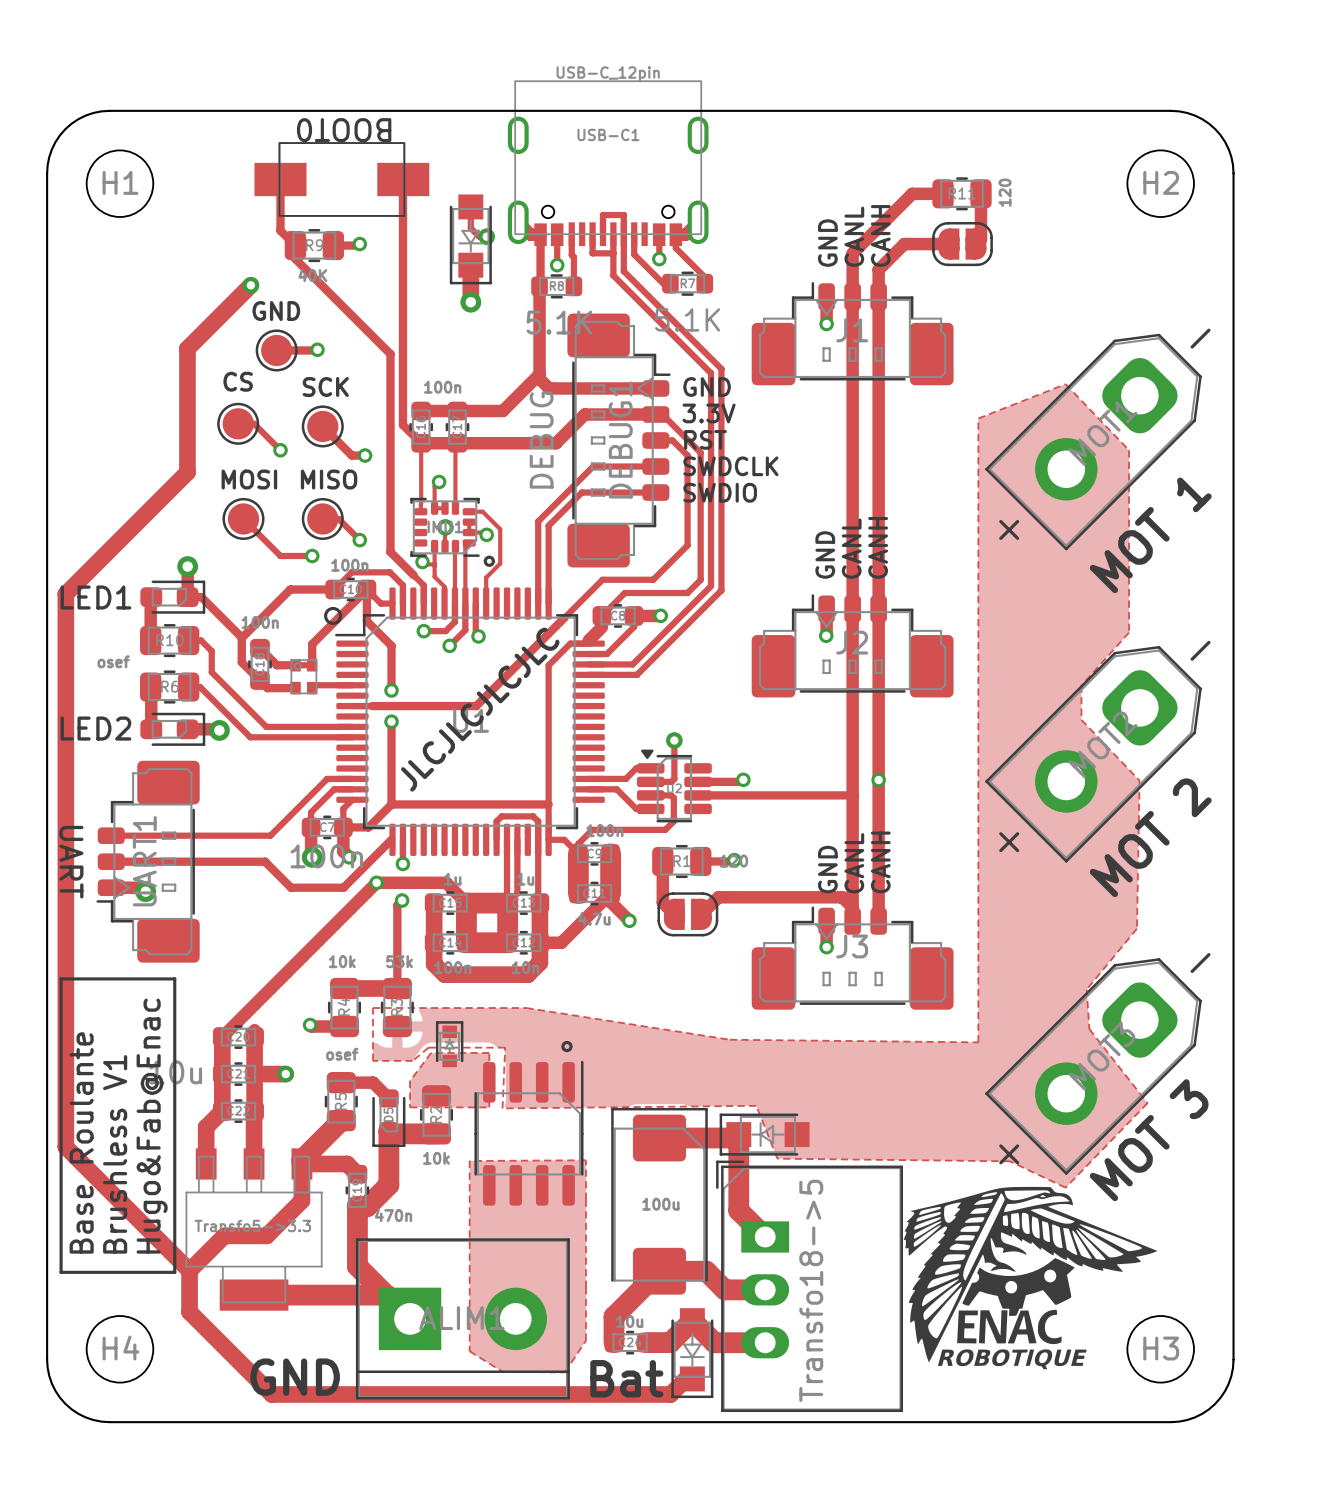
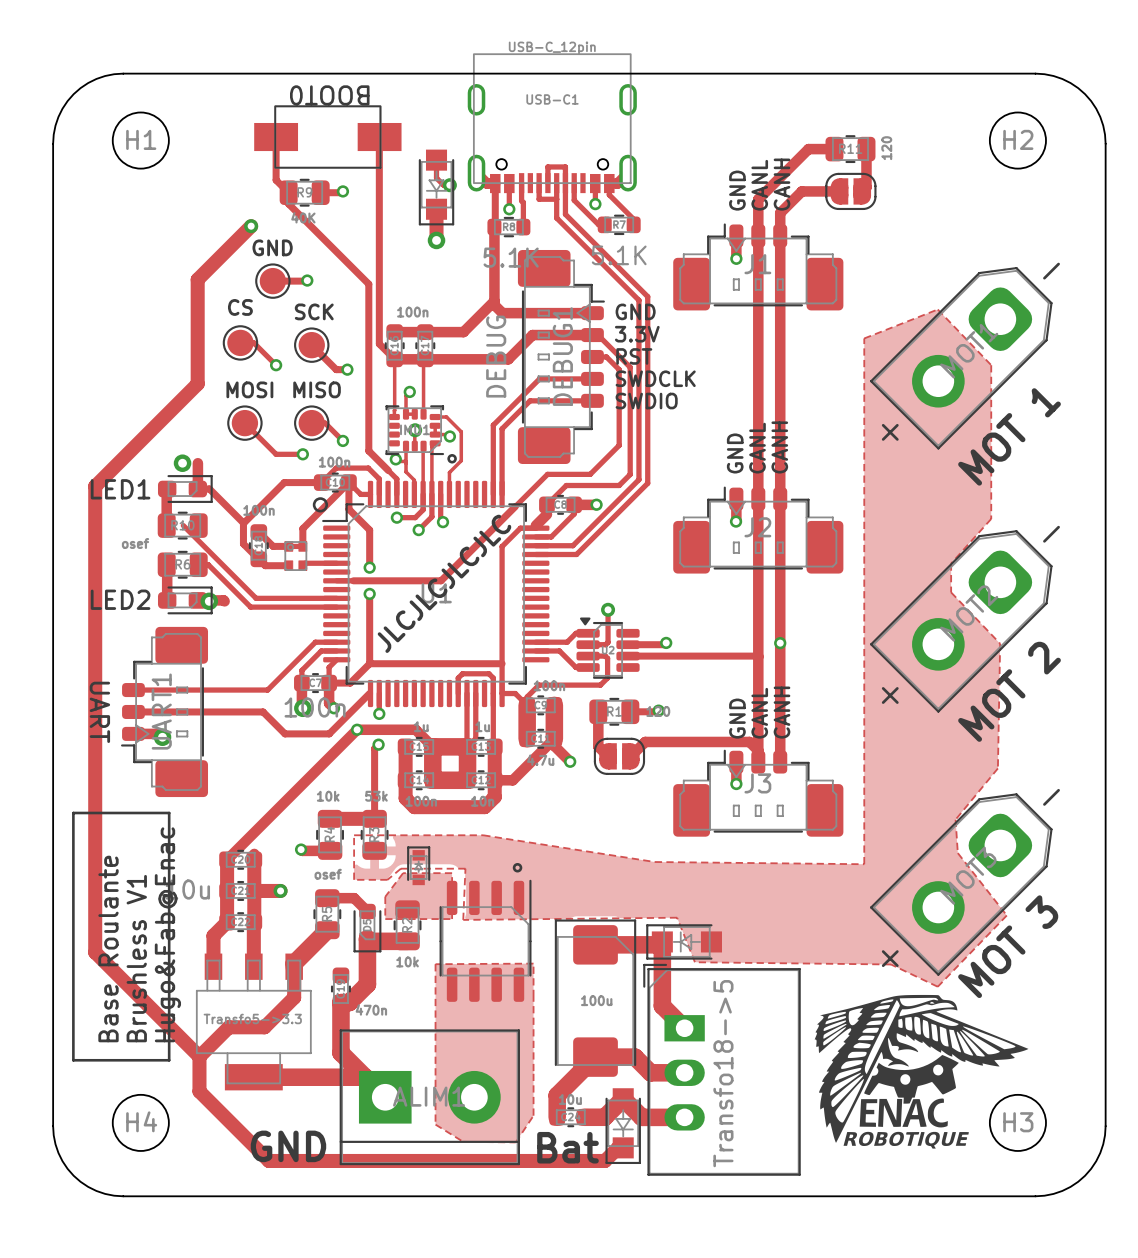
board edge: (109, 110) (1171, 110) (1187, 112) (1202, 119) (1220, 135) (1228, 149) (1233, 173) (1233, 1359) (1228, 1383) (1220, 1397) (1209, 1409) (1187, 1420) (1171, 1422) (109, 1422) (85, 1417) (71, 1409) (60, 1397) (49, 1375) (47, 1359) (47, 173) (51, 149) (65, 129) (85, 115) (109, 110) -> (123, 73) (96, 78) (73, 94) (58, 116) (53, 143) (53, 1126) (58, 1152) (67, 1168) (88, 1186) (105, 1193) (123, 1196) (1035, 1196) (1062, 1190) (1078, 1181) (1096, 1161) (1103, 1144) (1105, 1126) (1105, 143) (1103, 125) (1091, 101) (1070, 83) (1053, 76) (1035, 73) (123, 73)
via position: (187, 566) -> (182, 463)
track: (188, 640) (201, 640) (211, 651) (211, 672) (266, 726) -> (183, 525) (256, 598) (264, 598)
via position: (219, 730) -> (209, 601)
line: (61, 978) (174, 978) (174, 1272) (61, 1272) (61, 978) -> (73, 812) (169, 812) (169, 1060) (73, 1060) (73, 812)
track: (301, 1163) (347, 1163) (357, 1174) -> none
drawing position: (1030, 1278) -> (921, 1071)

